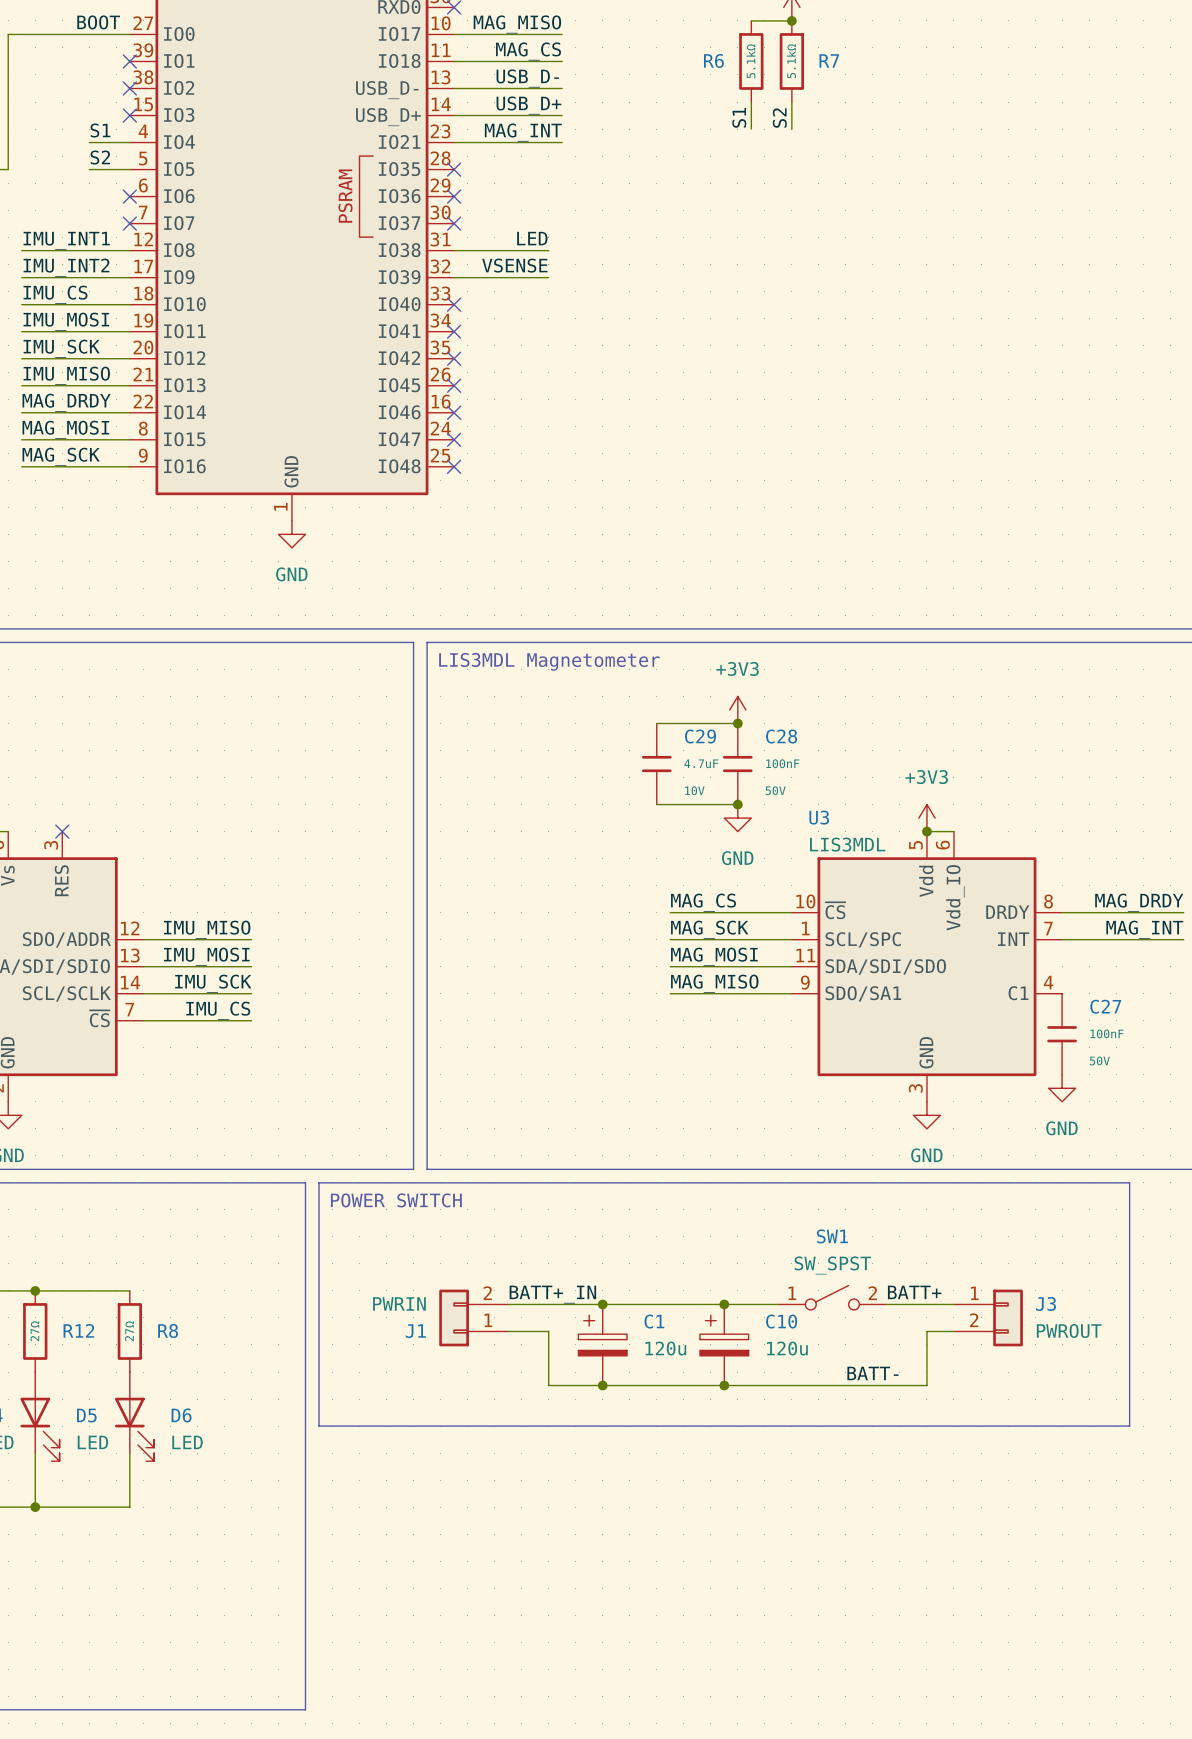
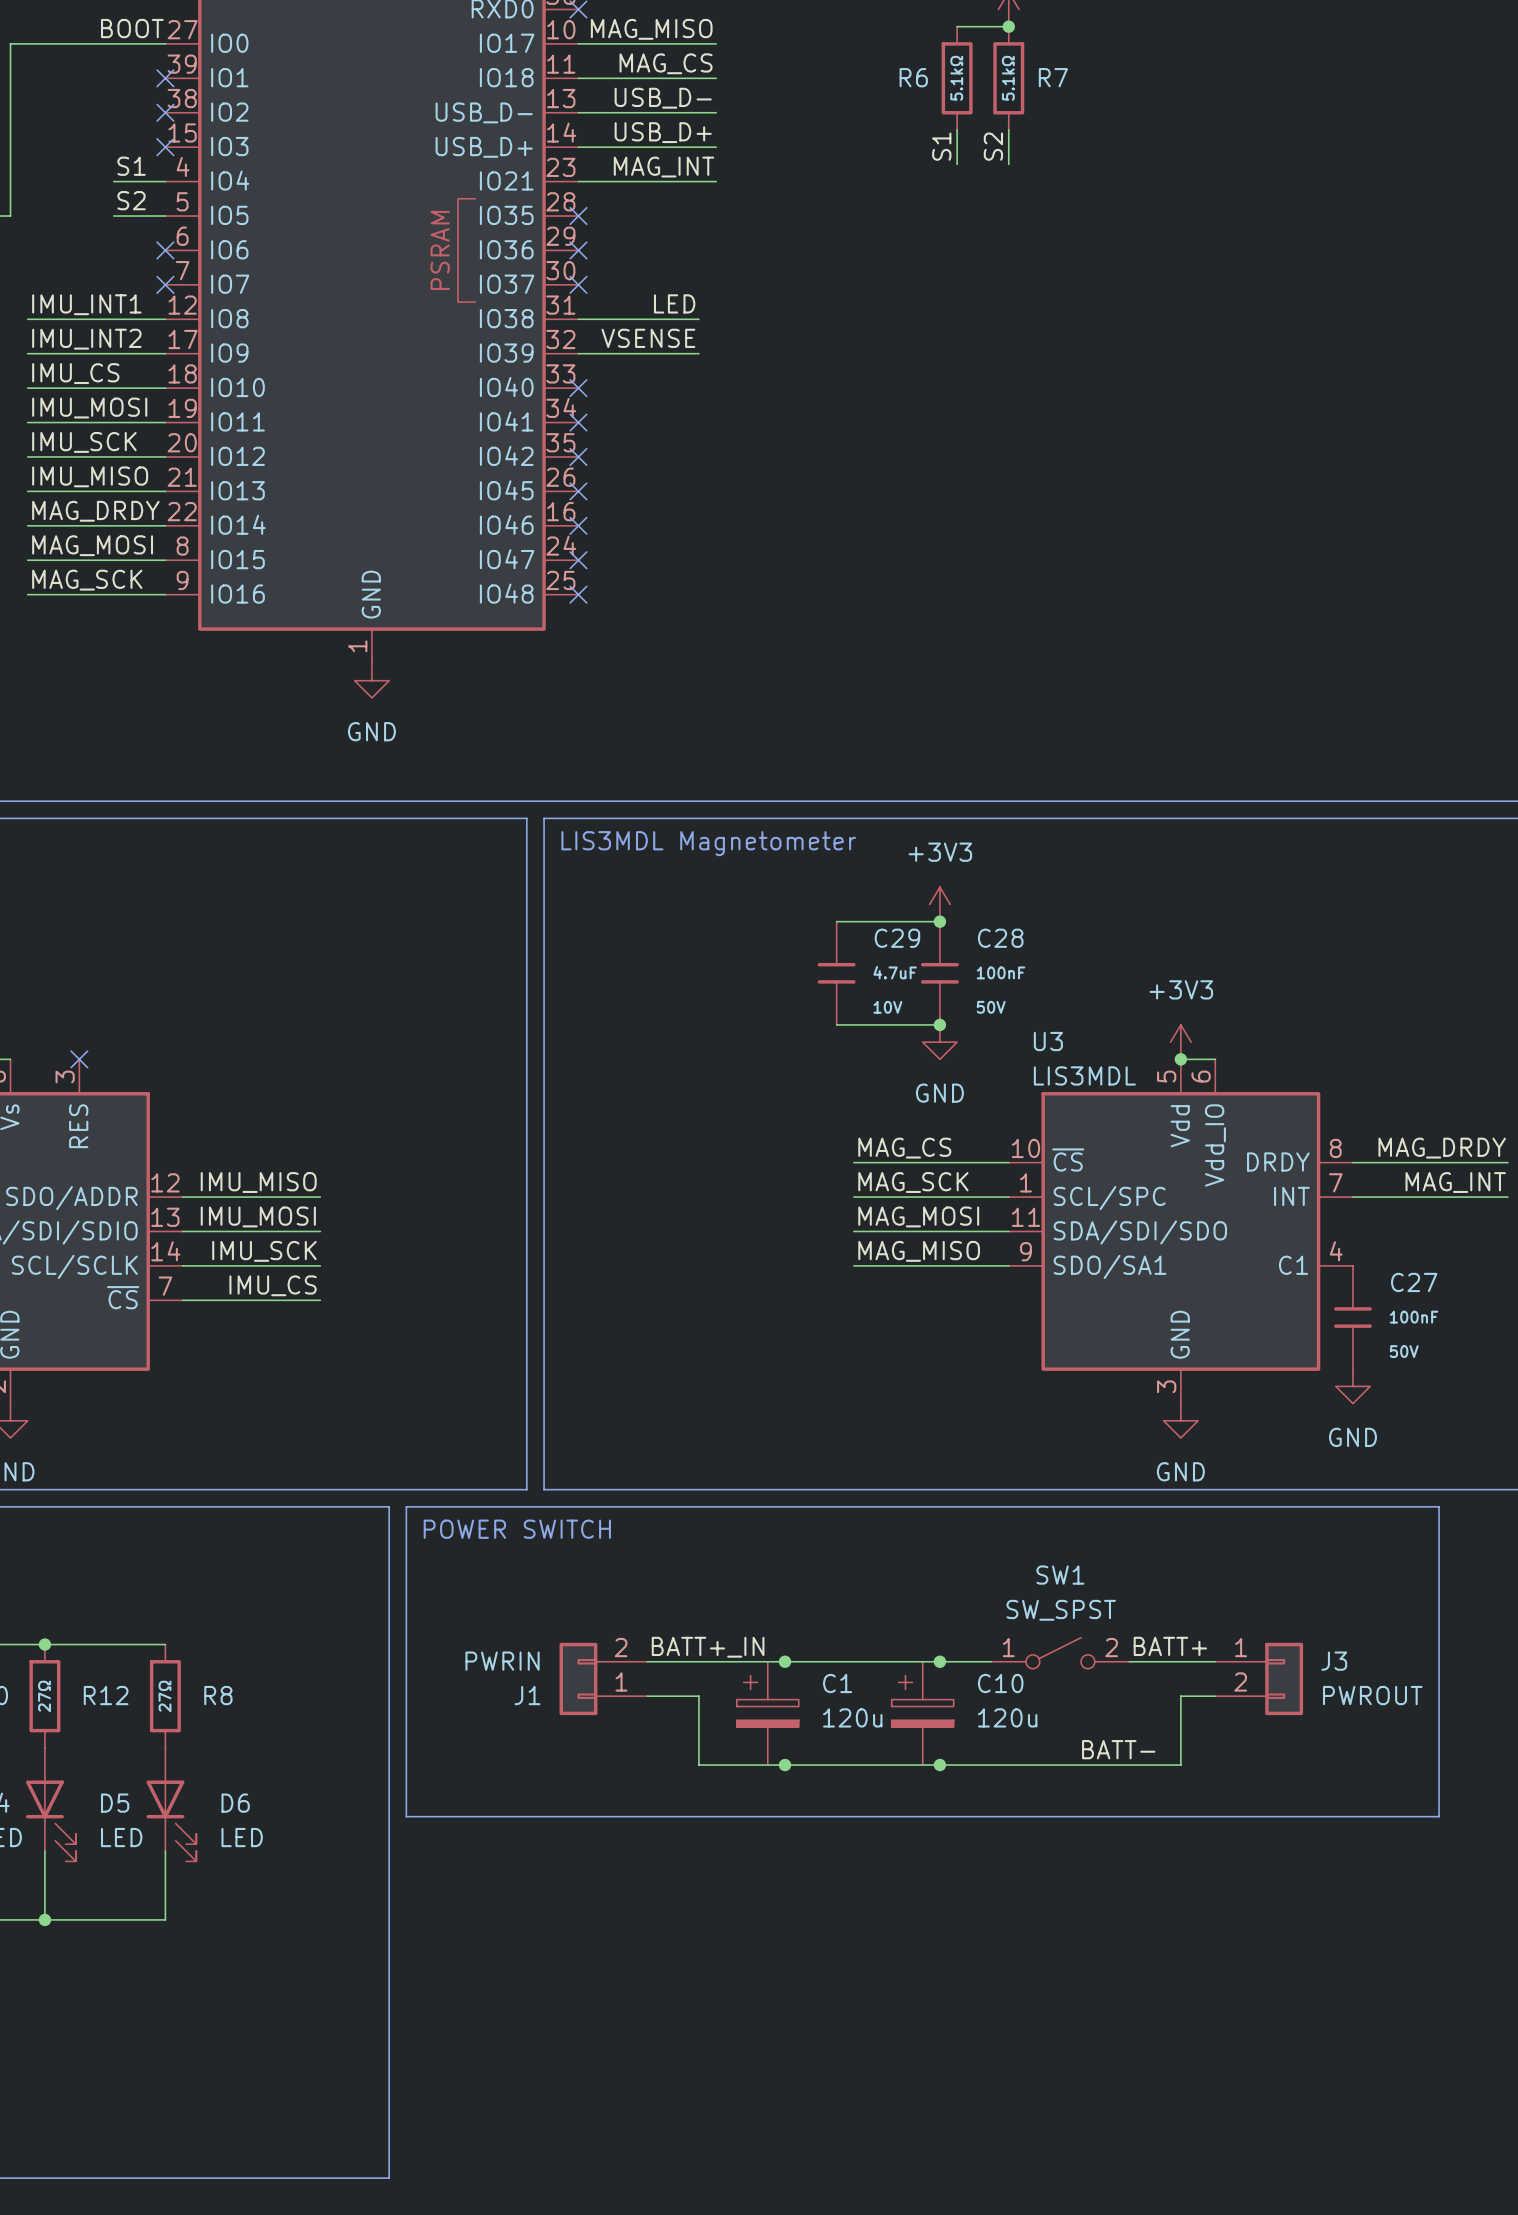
junction position: (602, 1304) -> (785, 1661)
junction position: (724, 1304) -> (939, 1661)
junction position: (602, 1385) -> (785, 1765)
junction position: (724, 1385) -> (939, 1765)

